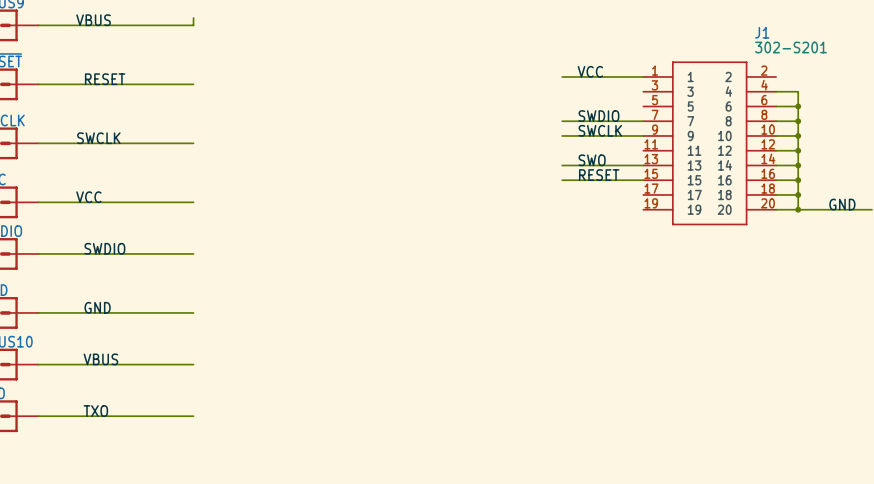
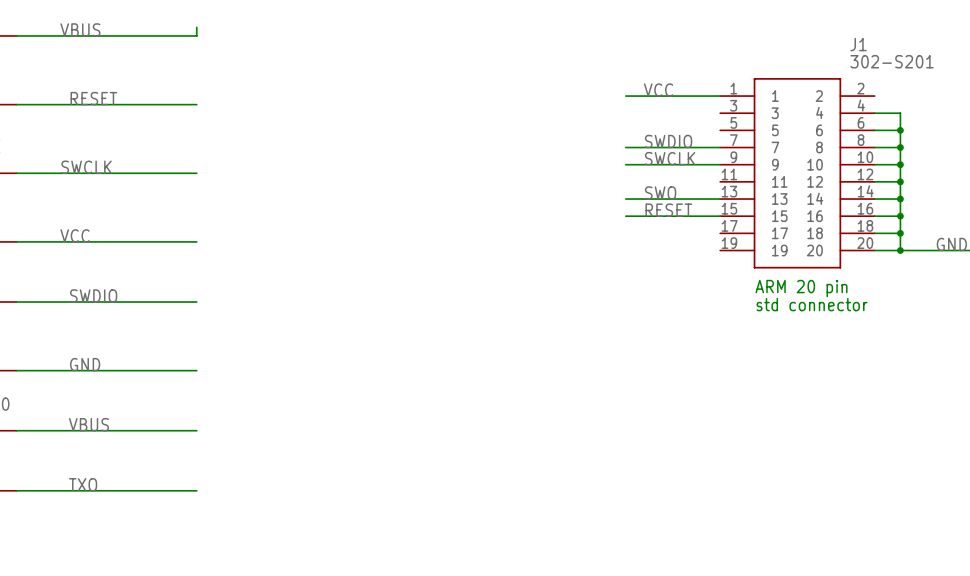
text: none -> ARM 20 pin (801, 288)
text: none -> std connector (812, 304)

